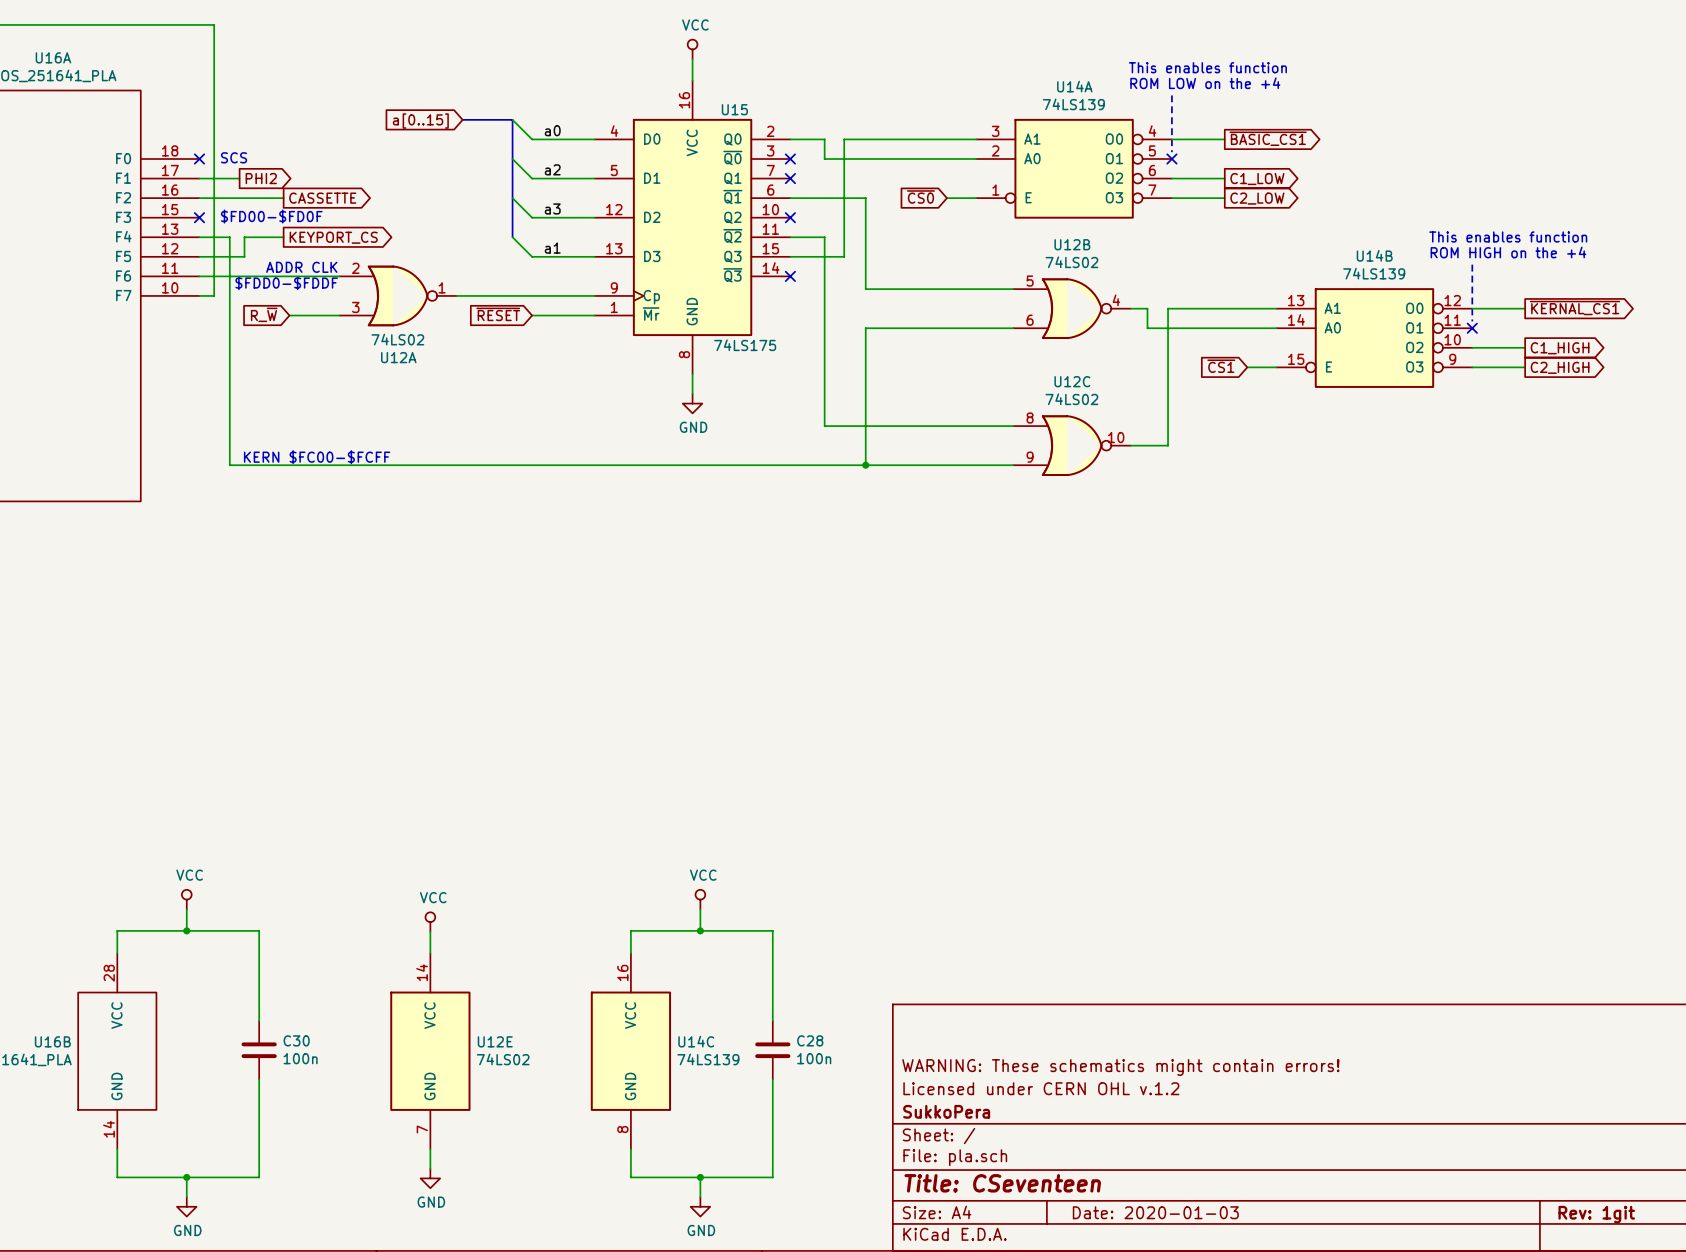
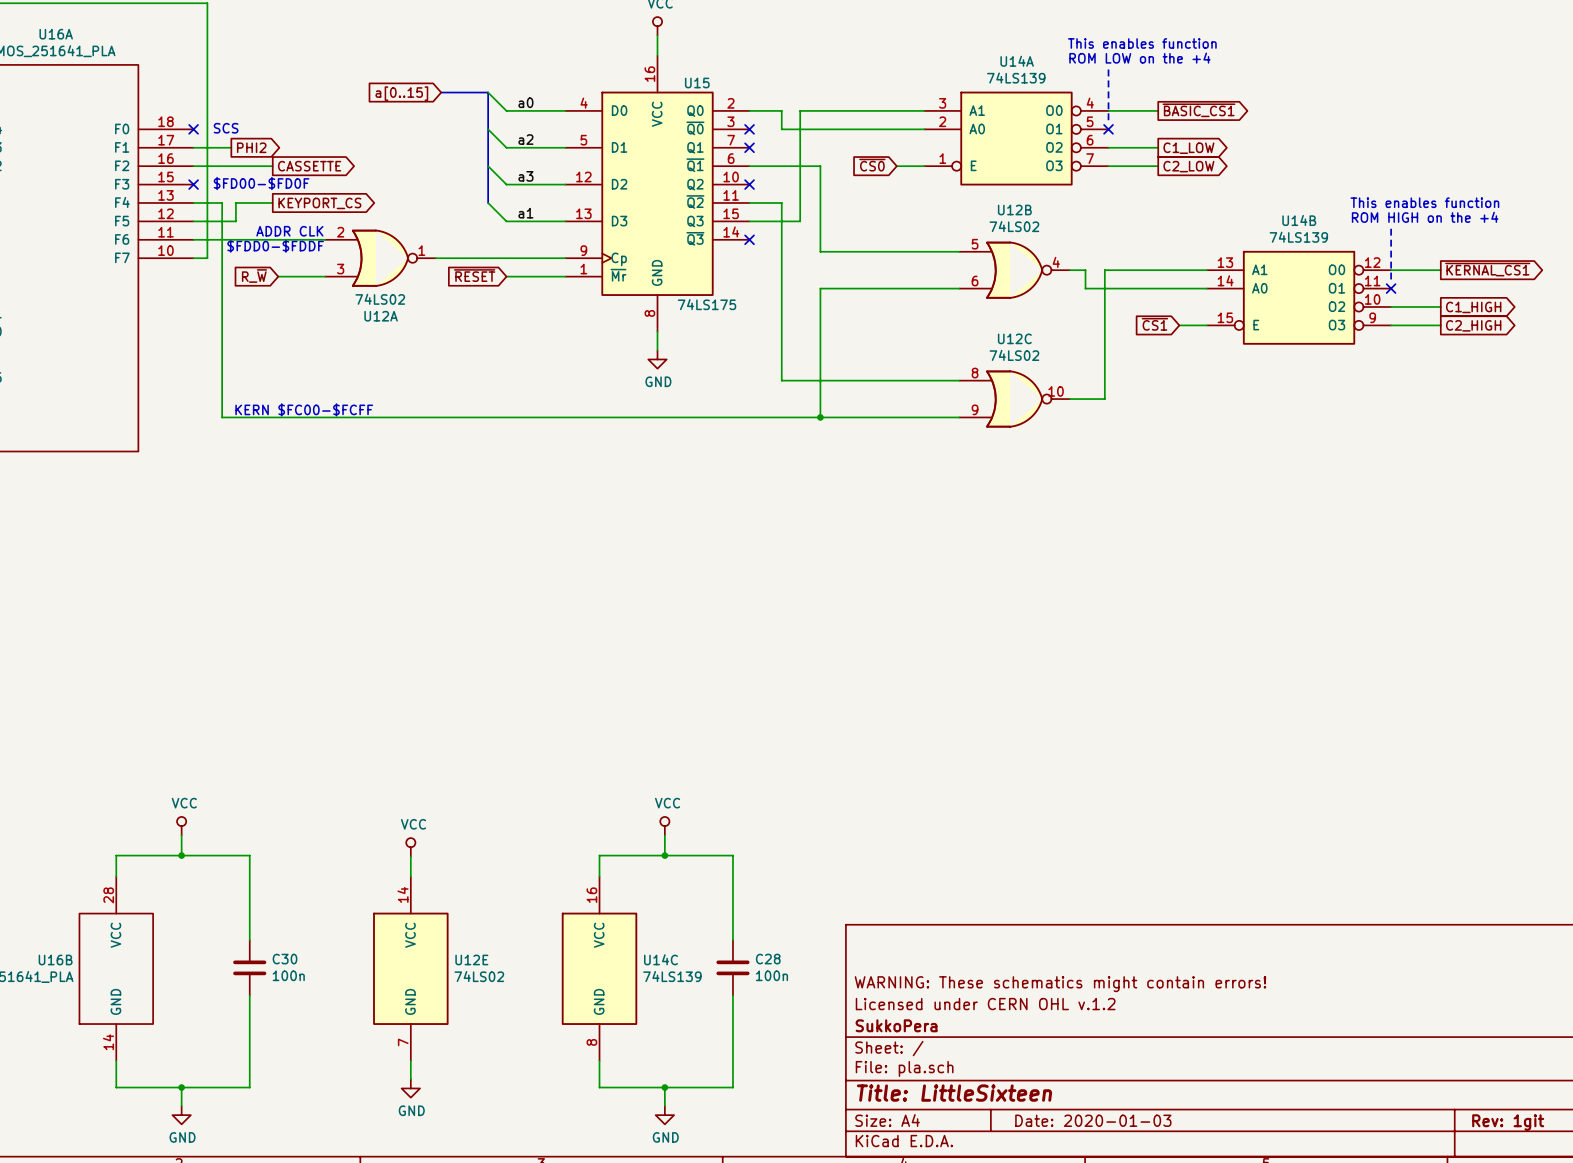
title block: Title: CSeventeen (1002, 1183) -> Title: LittleSixteen (954, 1093)

